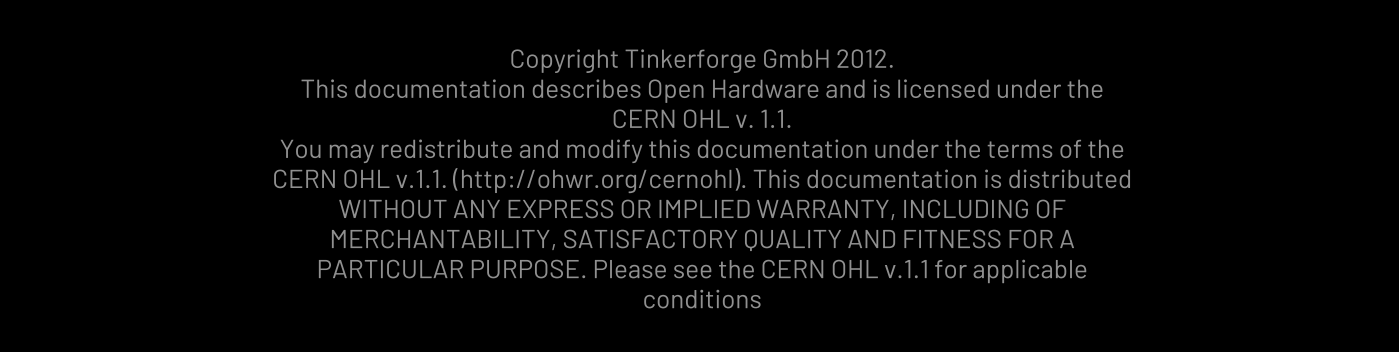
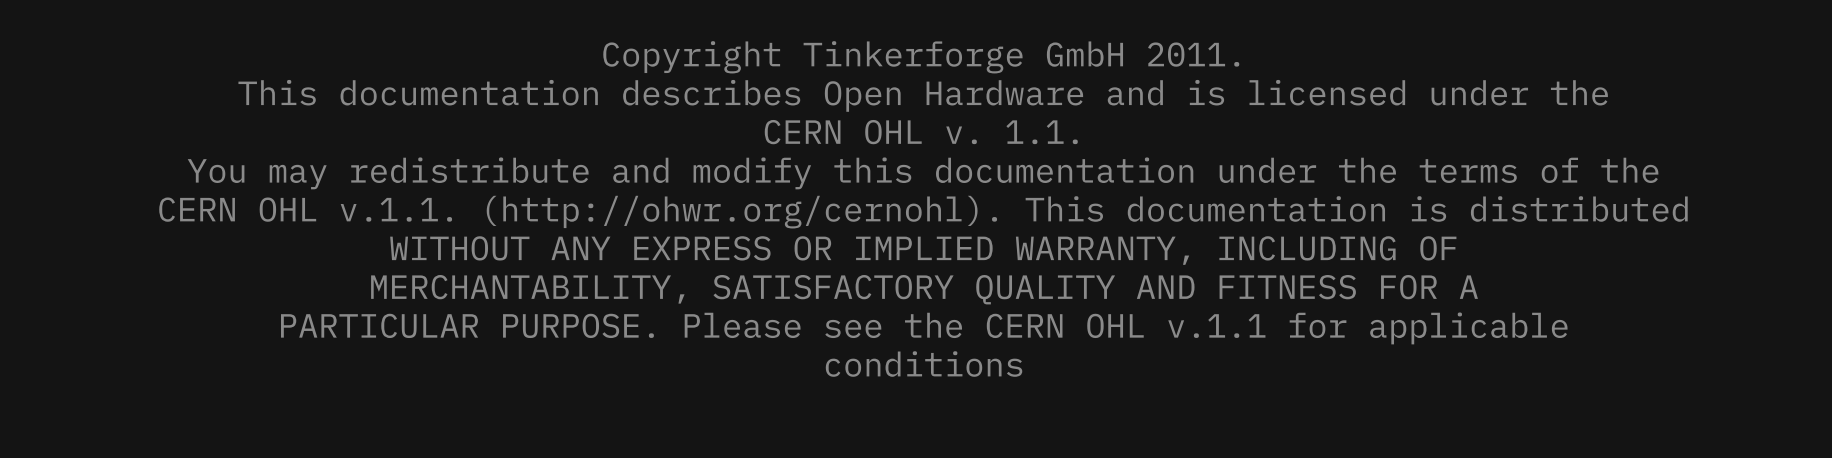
text: Copyright Tinkerforge GmbH 2012. (702, 61) -> Copyright Tinkerforge GmbH 2011. (921, 57)

